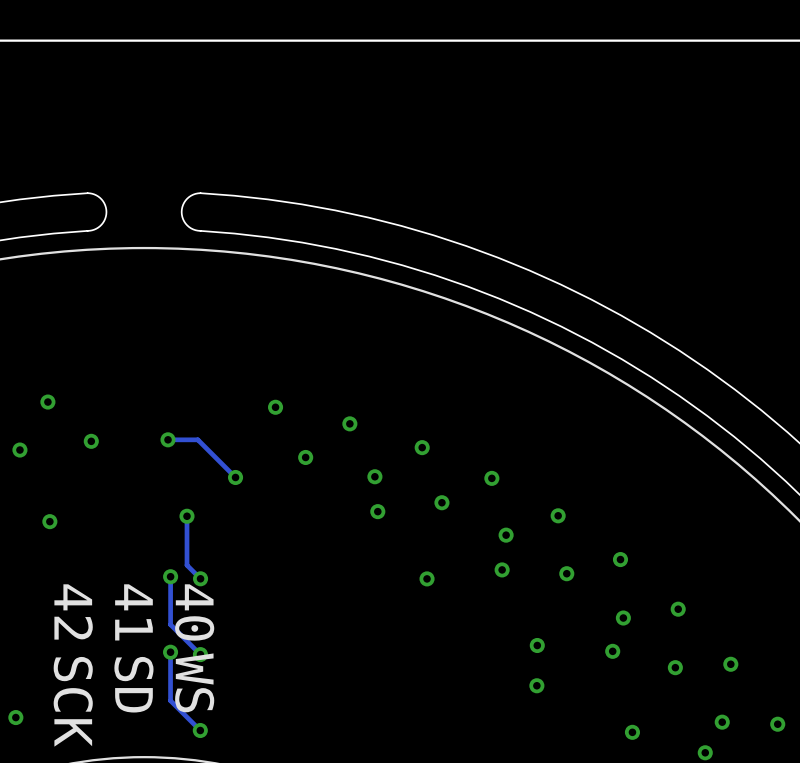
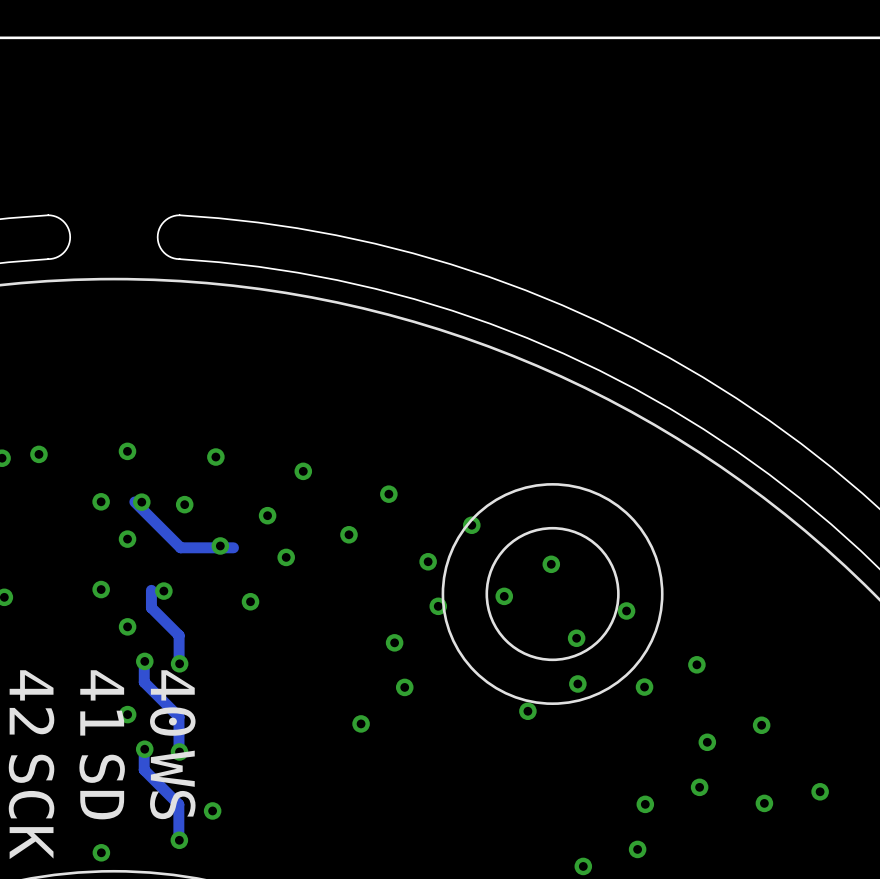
via: none -> (127, 451)
via: none -> (38, 454)
via: none -> (215, 457)
via: (275, 407) -> none
via: none -> (303, 471)
via: (349, 423) -> none
drawing: none -> [441, 483, 664, 706]
via: none -> (388, 494)
via: none -> (101, 501)
track: none -> (134, 501) (180, 547) (233, 547)
track: (168, 439) (197, 439) (235, 477) -> none
via: (91, 441) -> none
via: none -> (184, 504)
via: (422, 447) -> none
via: none -> (267, 515)
via: (305, 457) -> none
via: none -> (471, 525)
via: none -> (348, 534)
via: none -> (127, 539)
via: (374, 476) -> none
via: (491, 478) -> none
via: none -> (286, 557)
via: none -> (428, 561)
via: none -> (551, 564)
via: (441, 502) -> none
via: (377, 511) -> none
via: none -> (101, 589)
via: (558, 515) -> none
track: (187, 516) (187, 565) (200, 578) -> (151, 590) (151, 607) (179, 635) (179, 663)
via: none -> (504, 596)
via: none -> (250, 601)
via: none -> (438, 606)
via: none -> (626, 610)
via: (506, 535) -> none
via: none -> (127, 626)
via: none -> (576, 638)
via: (620, 559) -> none
via: none -> (394, 642)
via: (502, 569) -> none
via: (566, 573) -> none
track: (170, 576) (170, 624) (200, 654) -> (144, 661) (144, 682) (179, 717) (179, 751)
via: (427, 578) -> none
via: none -> (696, 664)
via: none -> (577, 683)
via: none -> (644, 687)
via: none -> (404, 687)
via: (678, 609) -> none
via: (623, 618) -> none
via: none -> (527, 711)
via: none -> (127, 714)
via: none -> (361, 723)
via: none -> (761, 725)
via: (537, 645) -> none
via: none -> (707, 742)
via: (612, 651) -> none
track: (170, 652) (170, 700) (200, 730) -> (144, 749) (144, 769) (178, 804) (178, 840)
via: (730, 664) -> none
via: (675, 667) -> none
via: none -> (699, 787)
via: (536, 685) -> none
via: none -> (820, 791)
via: none -> (764, 803)
via: none -> (645, 804)
via: none -> (212, 810)
via: (722, 722) -> none
via: (777, 724) -> none
via: (632, 732) -> none
via: none -> (637, 849)
via: none -> (101, 852)
via: none -> (583, 866)
via: (705, 752) -> none

